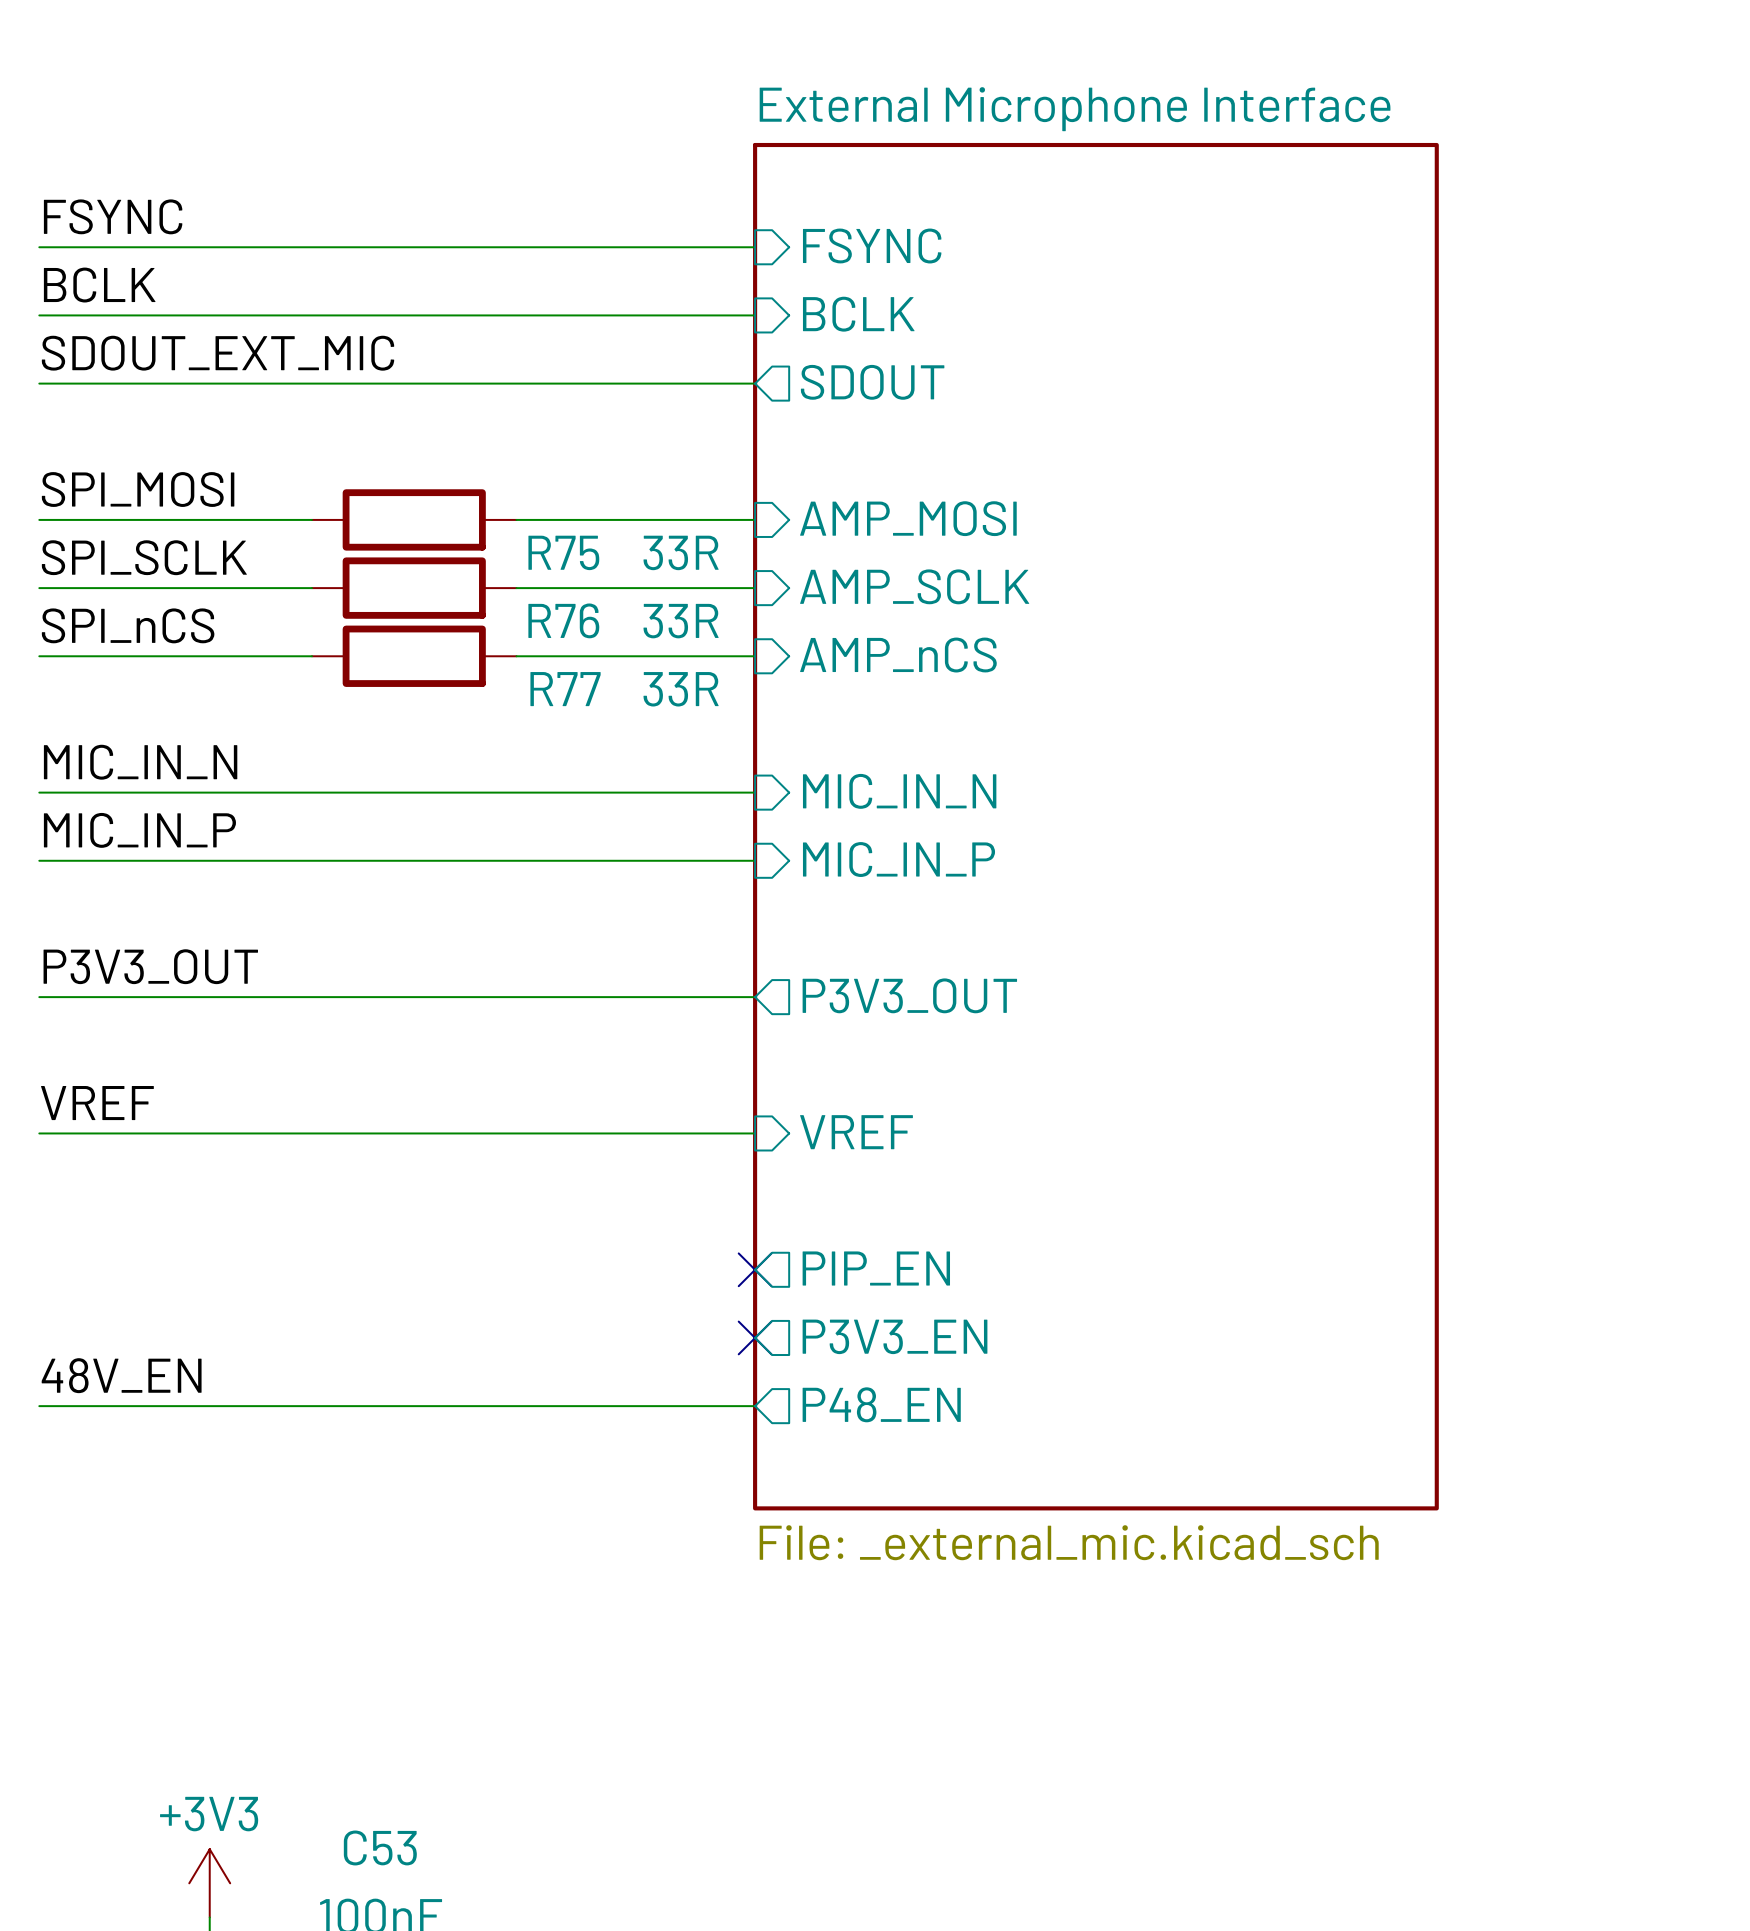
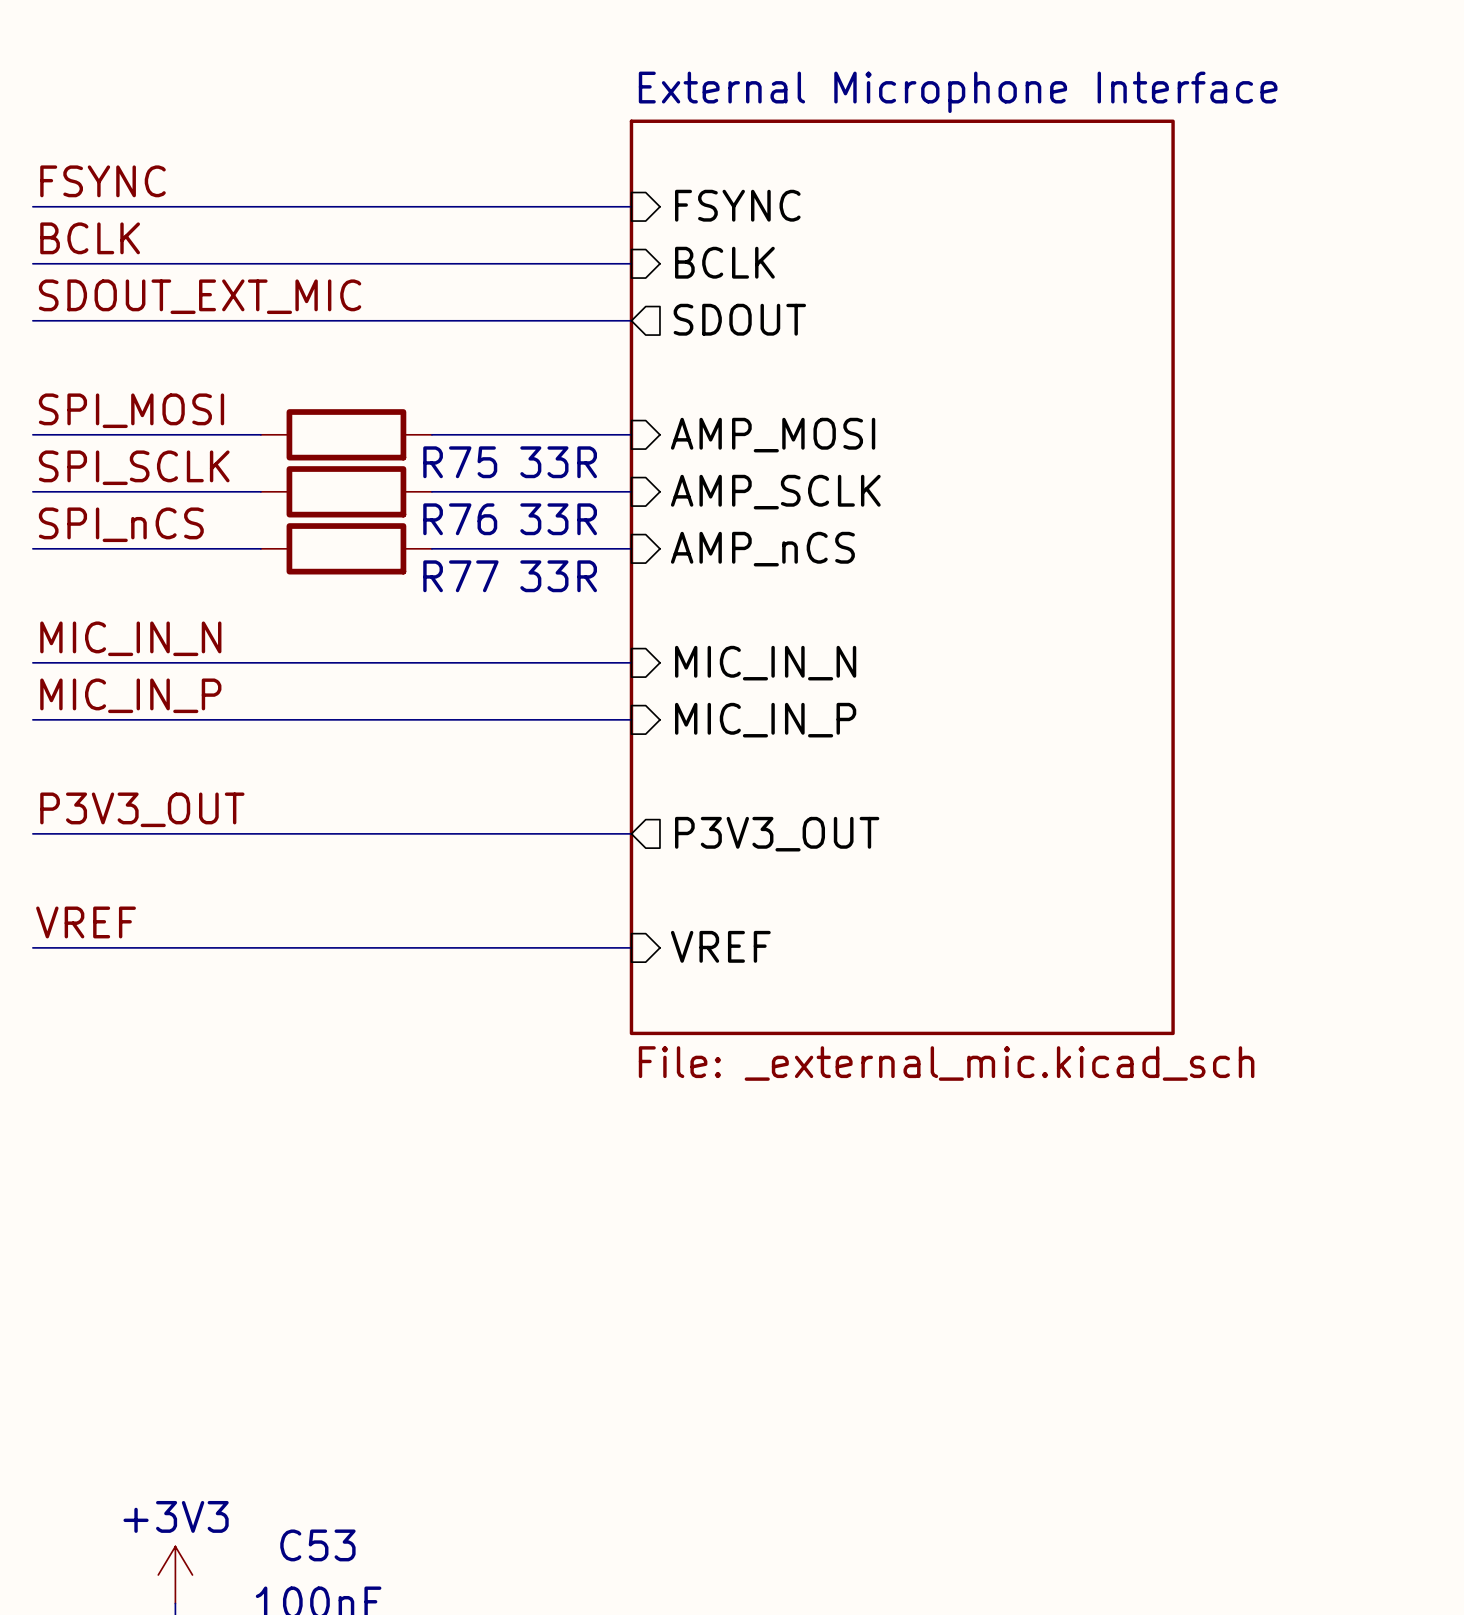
sheet External Microphone Interface: none -> File: _external_mic.kicad_sch (902, 577)
sheet External Microphone Interface: File: _external_mic.kicad_sch (1095, 826) -> none
sheet pin: PIP_EN (876, 1268) -> none
no-connect mark: (755, 1269) -> none
sheet pin: P3V3_EN (895, 1336) -> none
no-connect mark: (755, 1337) -> none
label: 48V_EN (121, 1375) -> none
sheet pin: P48_EN (881, 1404) -> none
wire: (39, 1406) (755, 1406) -> none

